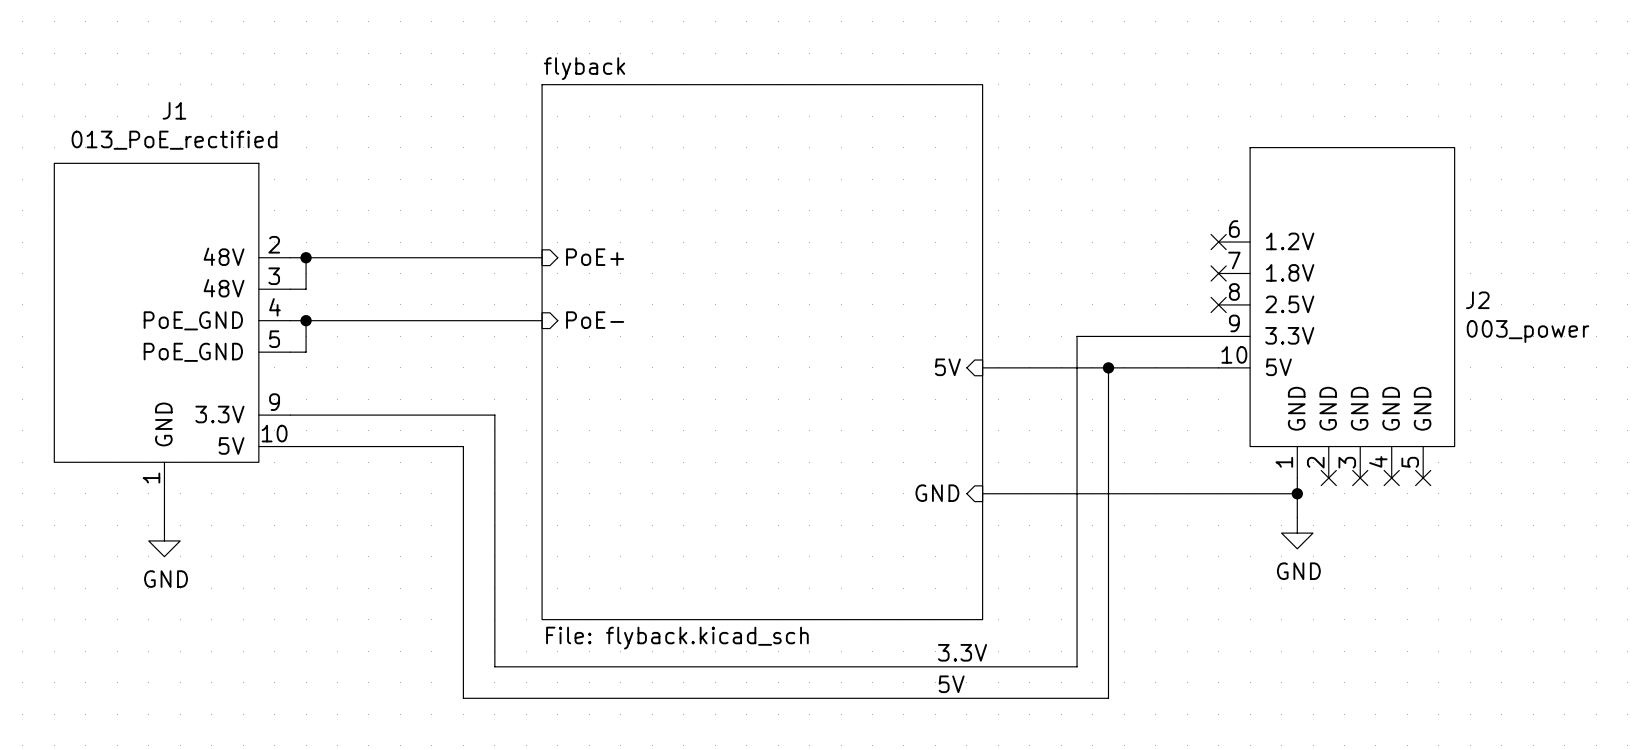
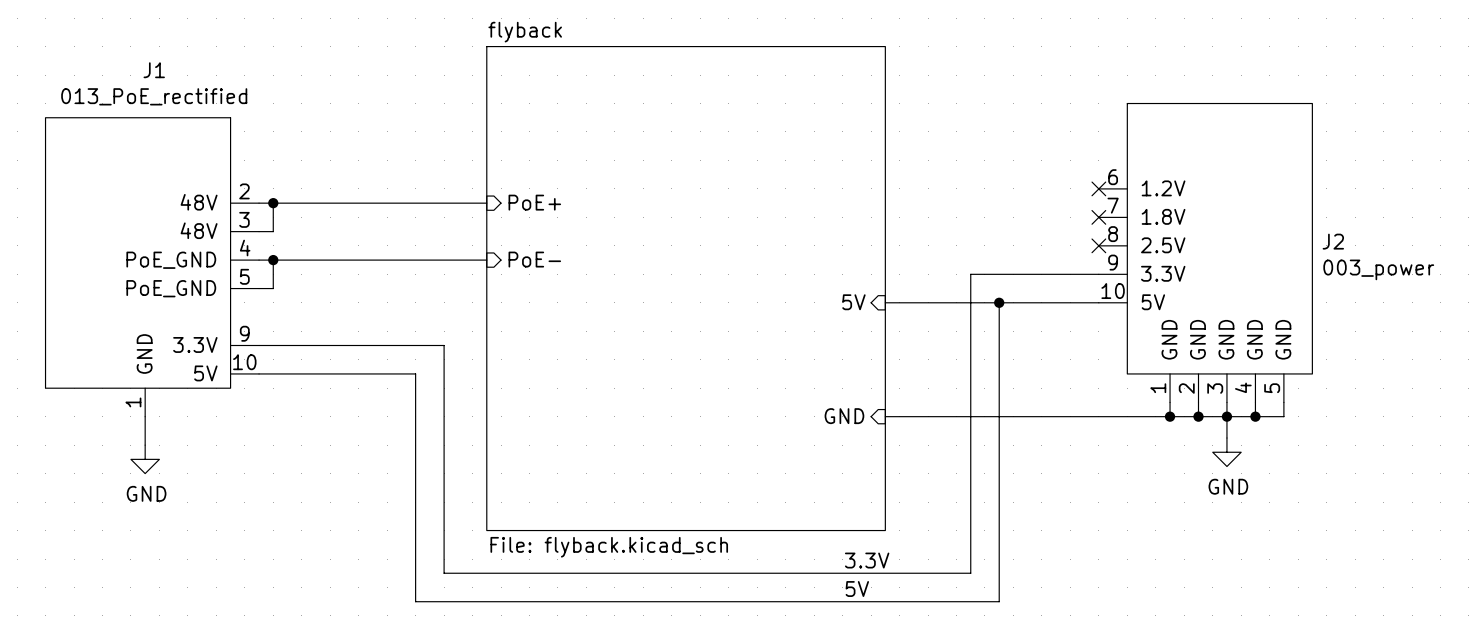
wire: none -> (1198, 402) (1198, 416)
no-connect mark: (1328, 478) -> none
wire: none -> (1226, 402) (1226, 438)
no-connect mark: (1360, 478) -> none
wire: none -> (1255, 402) (1255, 416)
no-connect mark: (1391, 478) -> none
no-connect mark: (1423, 478) -> none
wire: (1297, 493) (1297, 517) -> (1170, 416) (1283, 416) (1283, 402)
junction: none -> (1198, 416)
junction: none -> (1226, 416)
junction: none -> (1255, 416)
power symbol position: GND (1297, 533) -> GND (1226, 452)

